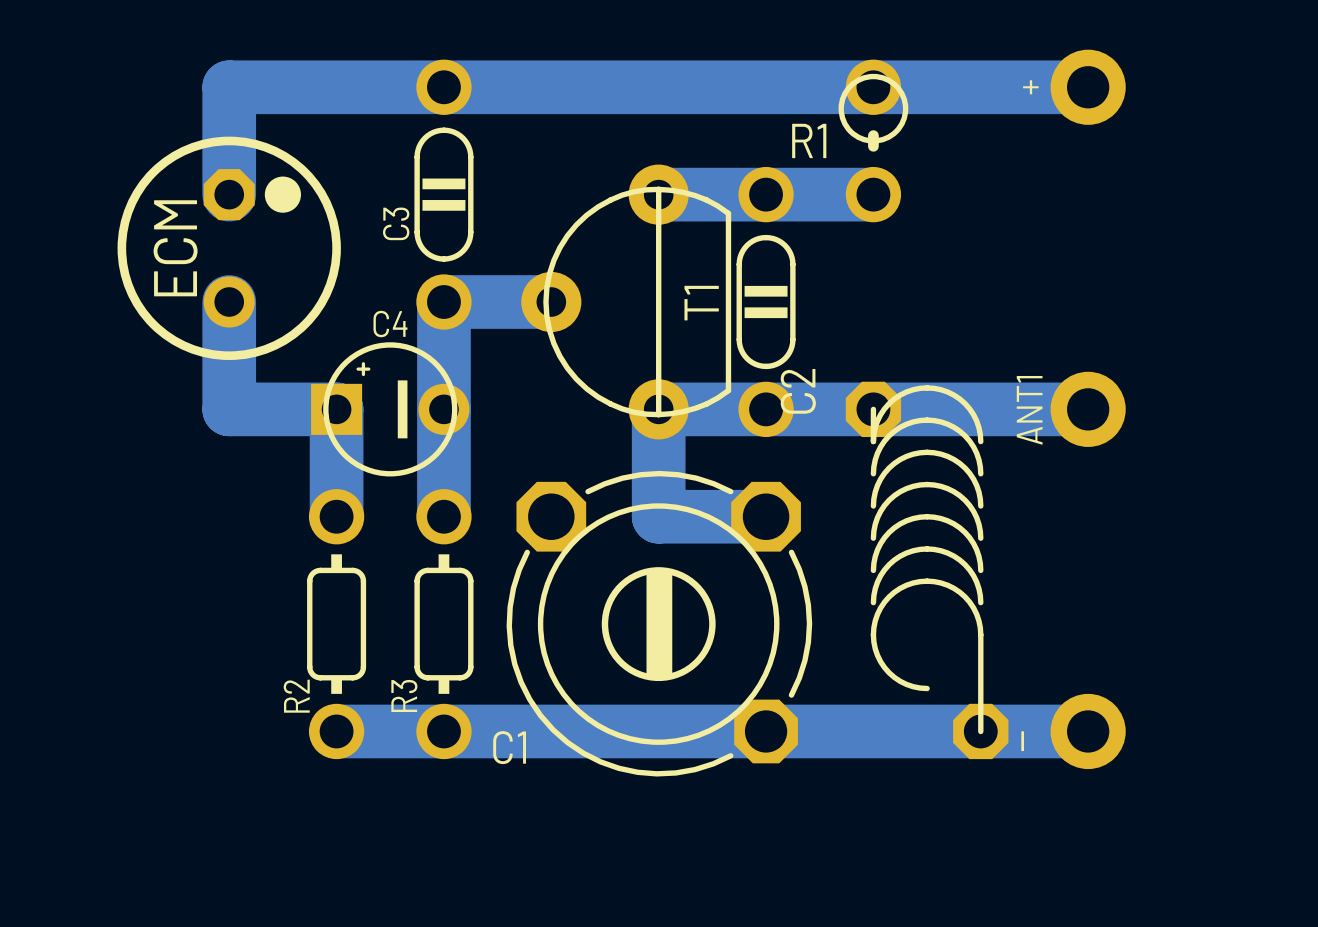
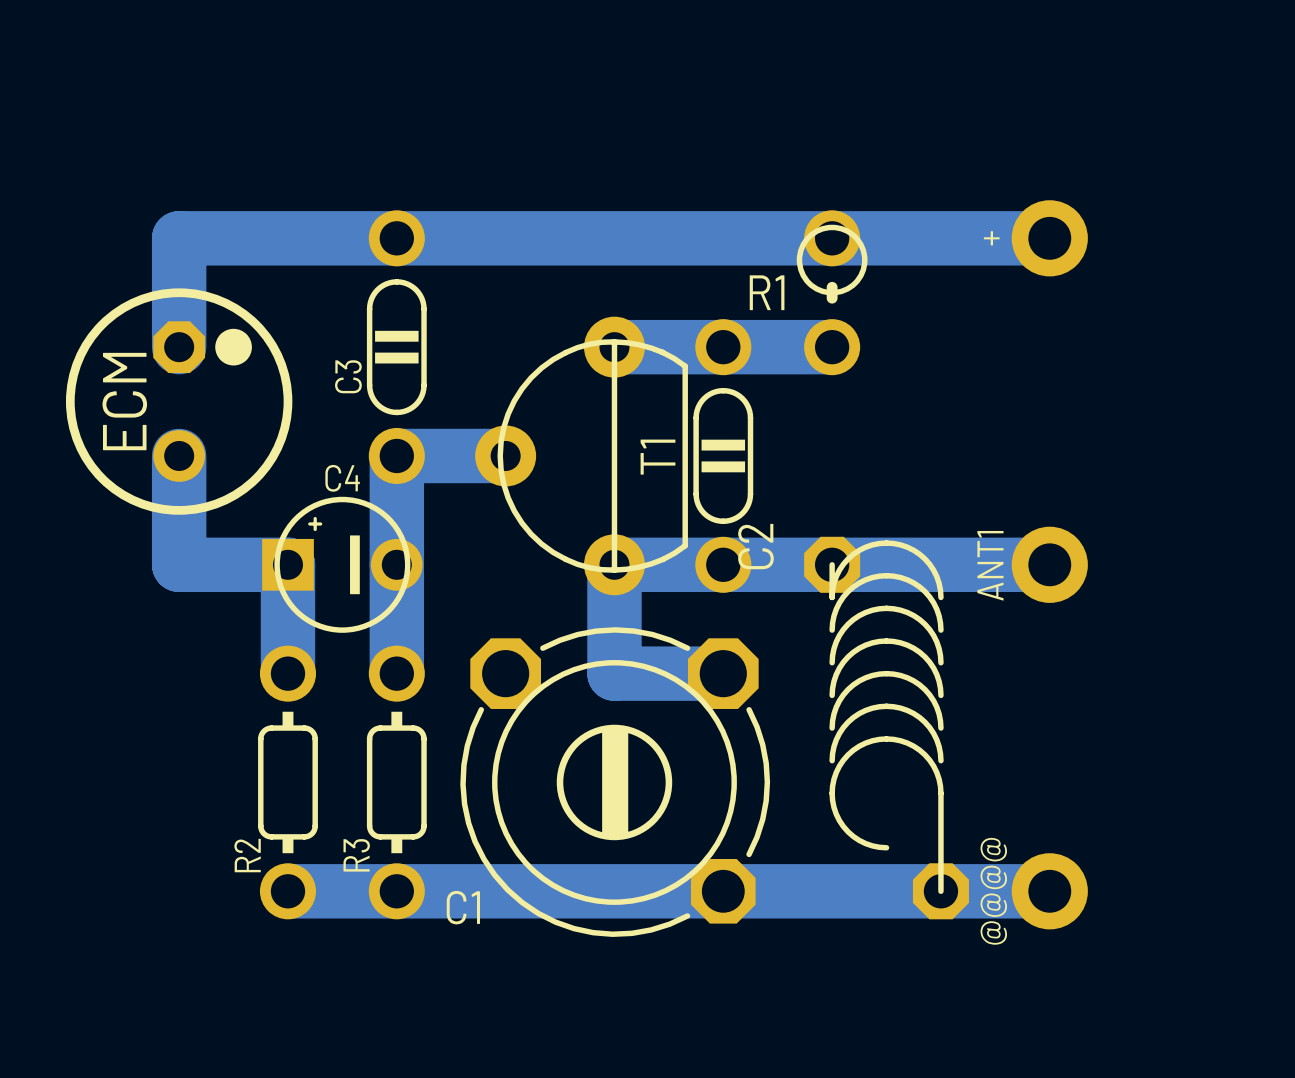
part name: ̶̶ (1022, 741) -> @@@@ (993, 891)

